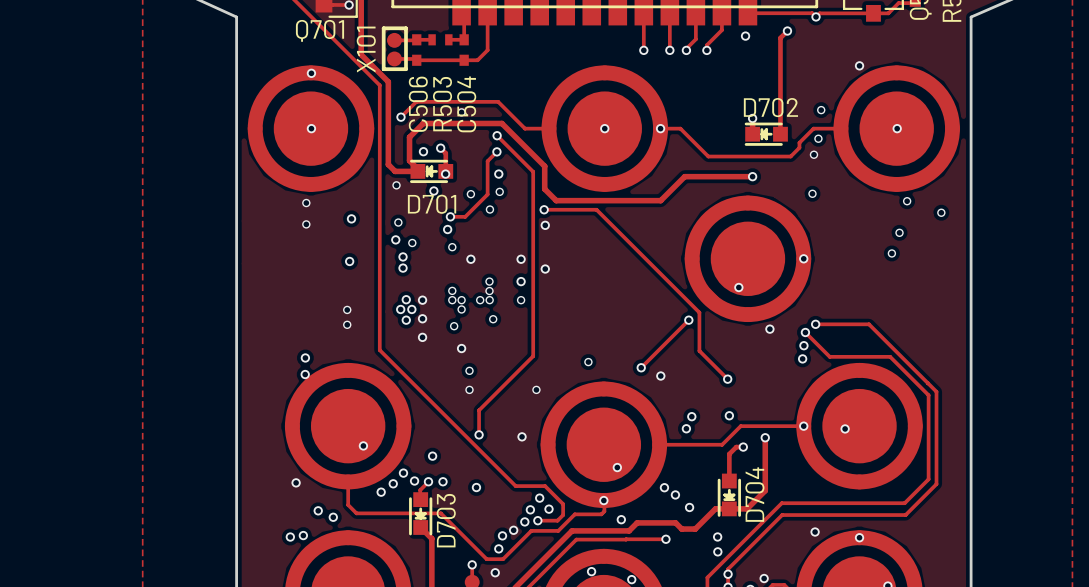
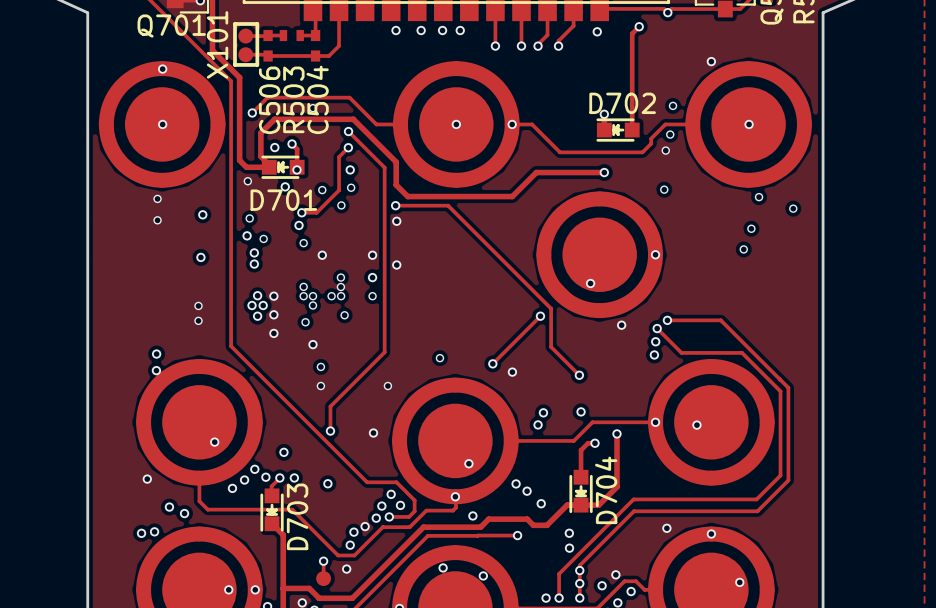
via: none -> (396, 30)
via: none -> (421, 30)
via: none -> (442, 30)
via: none -> (460, 30)

